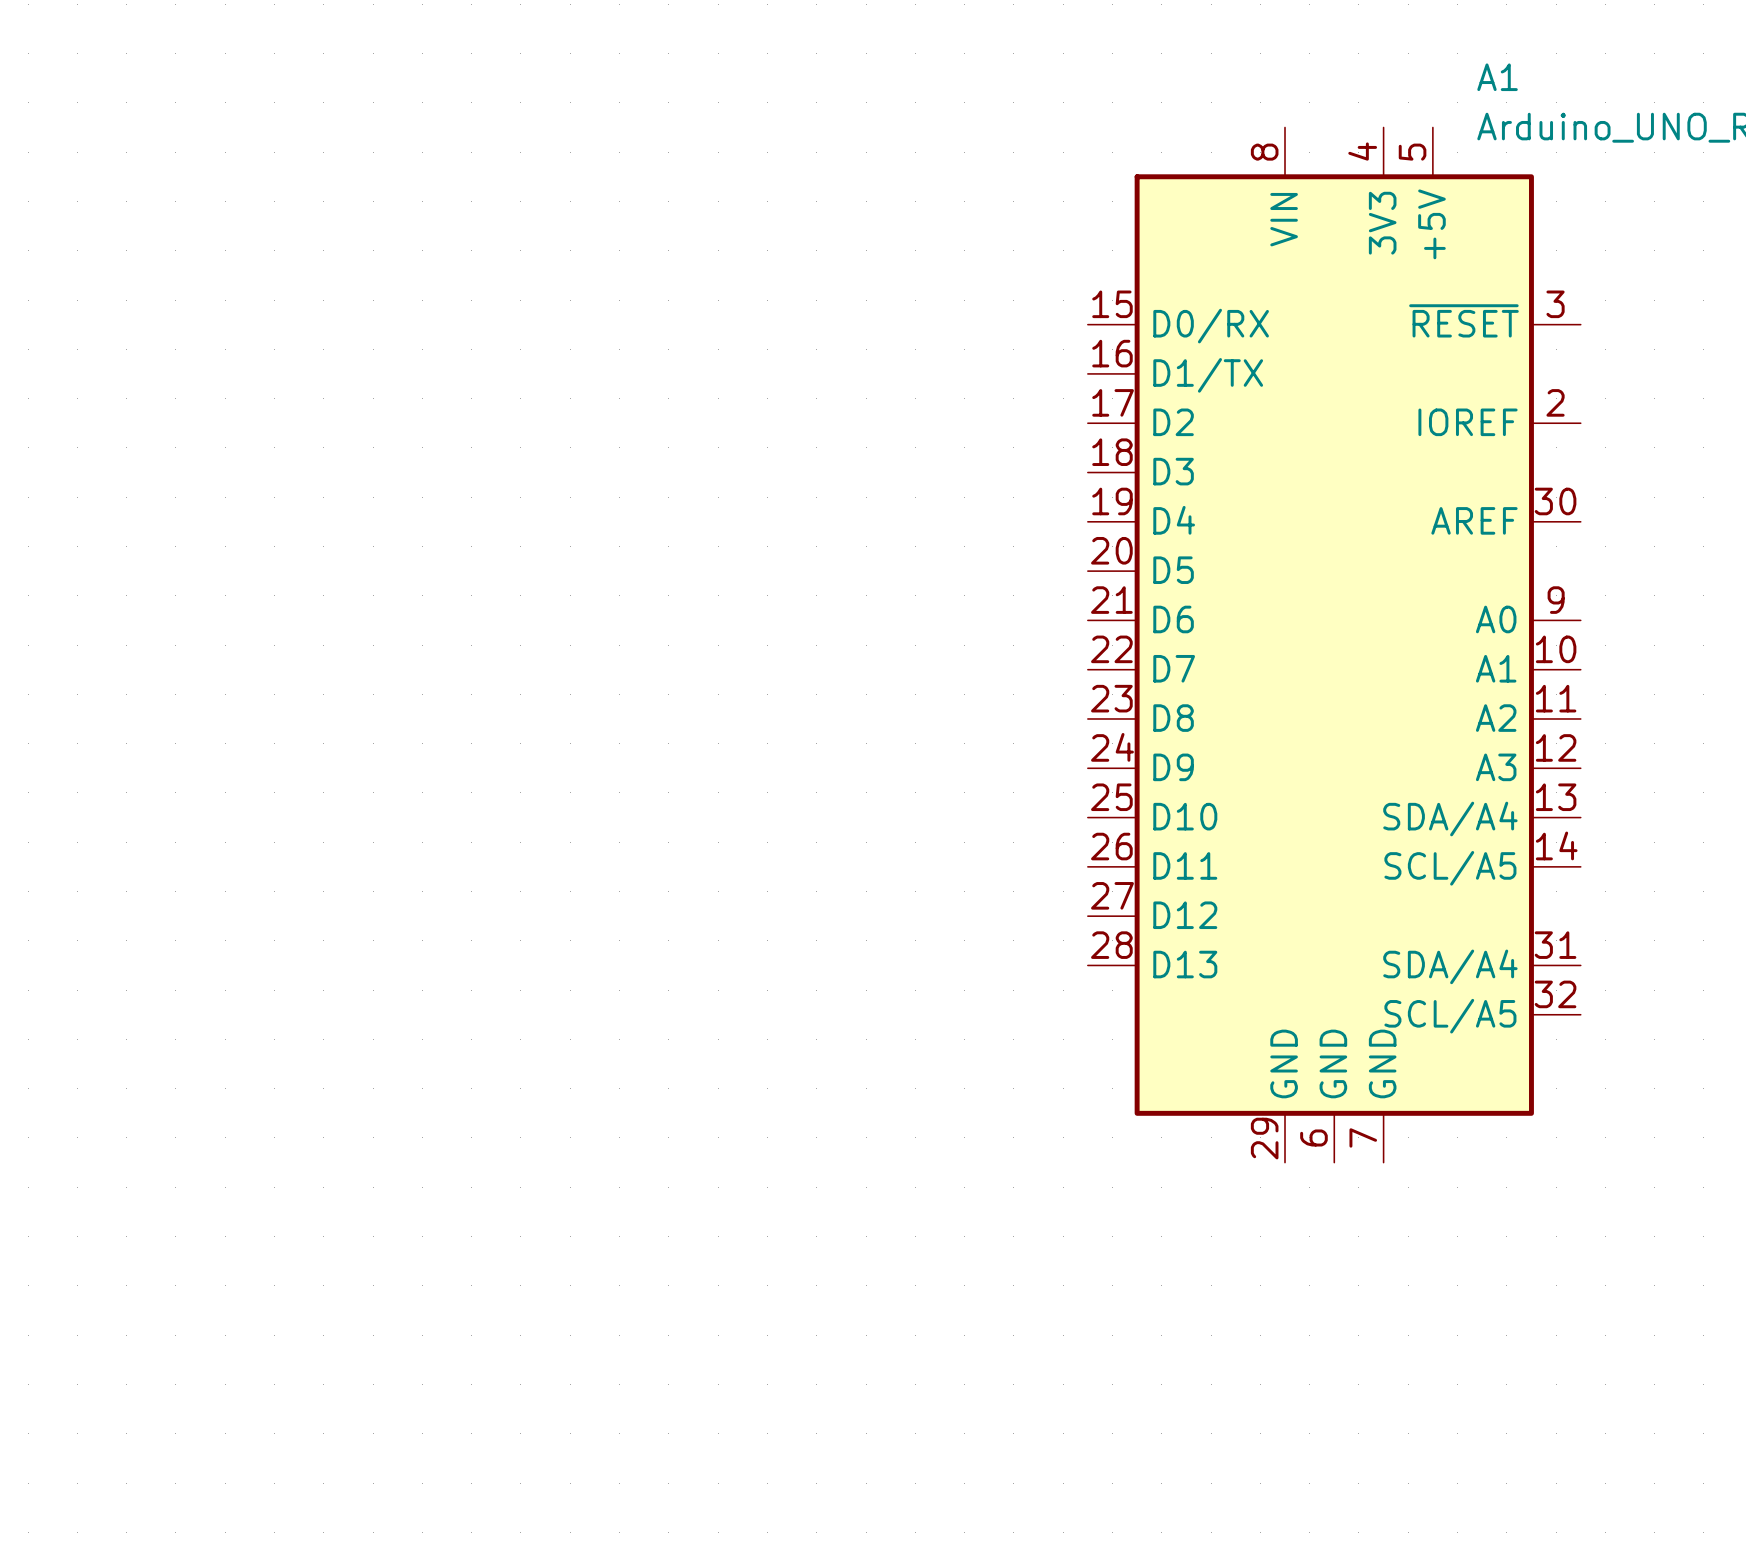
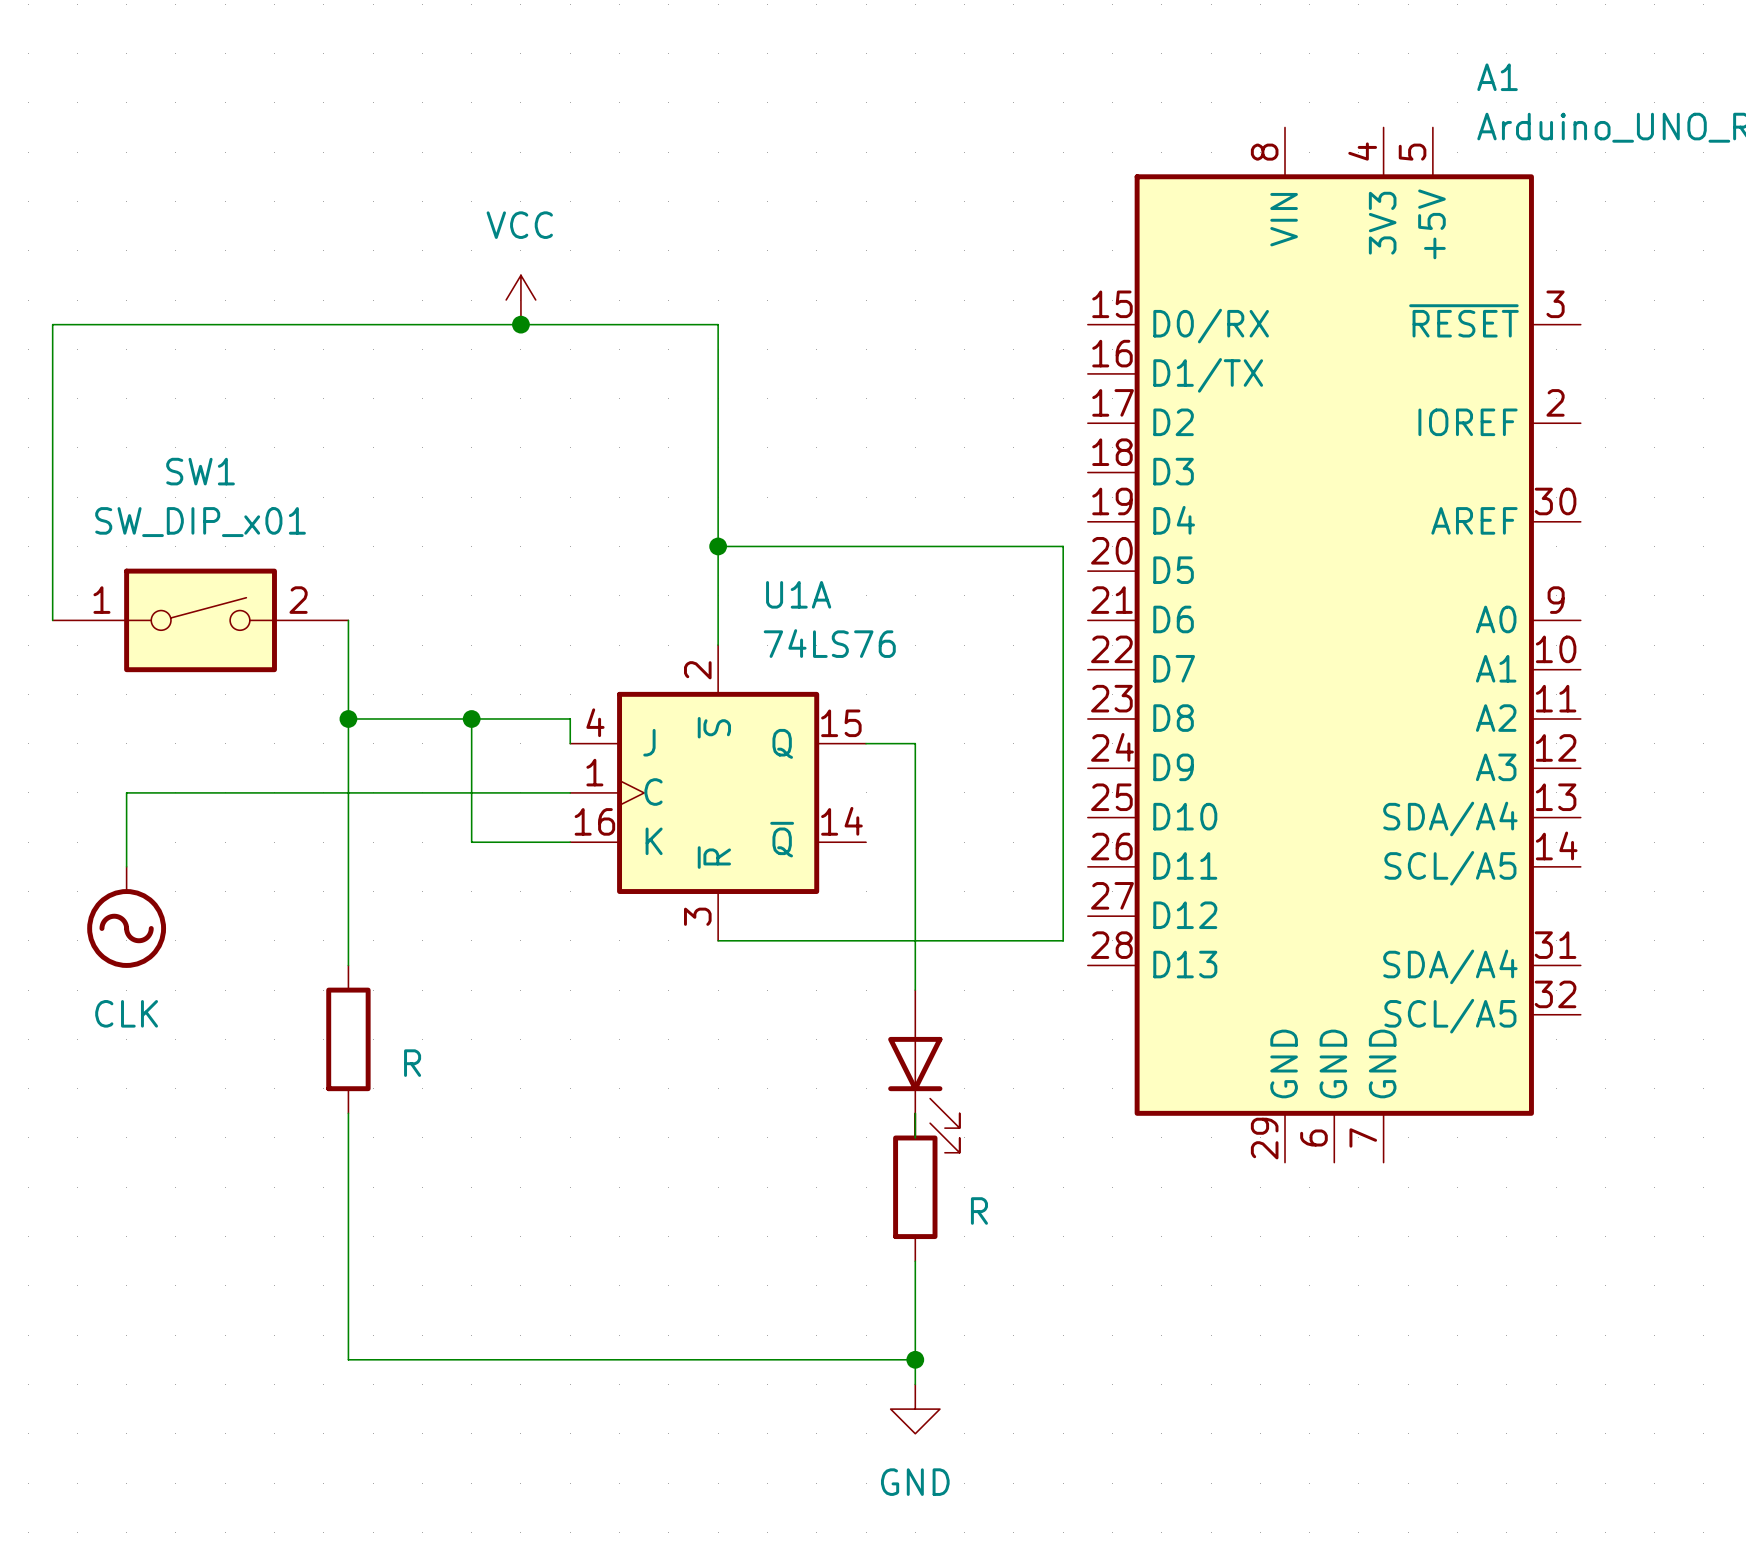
power symbol: none -> VCC (520, 300)
junction: none -> (520, 324)
wire: none -> (718, 546) (1063, 546) (1063, 940) (718, 940)
junction: none -> (718, 546)
wire: none -> (52, 620) (52, 324) (718, 324) (718, 645)
SW1: none -> SW_DIP_x01 (200, 620)
wire: none -> (348, 620) (348, 965)
wire: none -> (348, 718) (570, 718) (570, 743)
junction: none -> (348, 718)
wire: none -> (471, 718) (471, 842) (570, 842)
junction: none -> (471, 718)
wire: none -> (866, 743) (915, 743) (915, 990)
wire: none -> (570, 792) (126, 792) (126, 866)
U1A: none -> 74LS76 (718, 792)
power symbol: none -> CLK (126, 917)
part: none -> R (348, 1039)
part: none -> (923, 1071)
wire: none -> (348, 1113) (348, 1359) (915, 1359)
wire: none -> (915, 1113) (915, 1137)
part: none -> R (915, 1187)
wire: none -> (915, 1261) (915, 1384)
junction: none -> (915, 1359)
power symbol: none -> GND (915, 1409)

